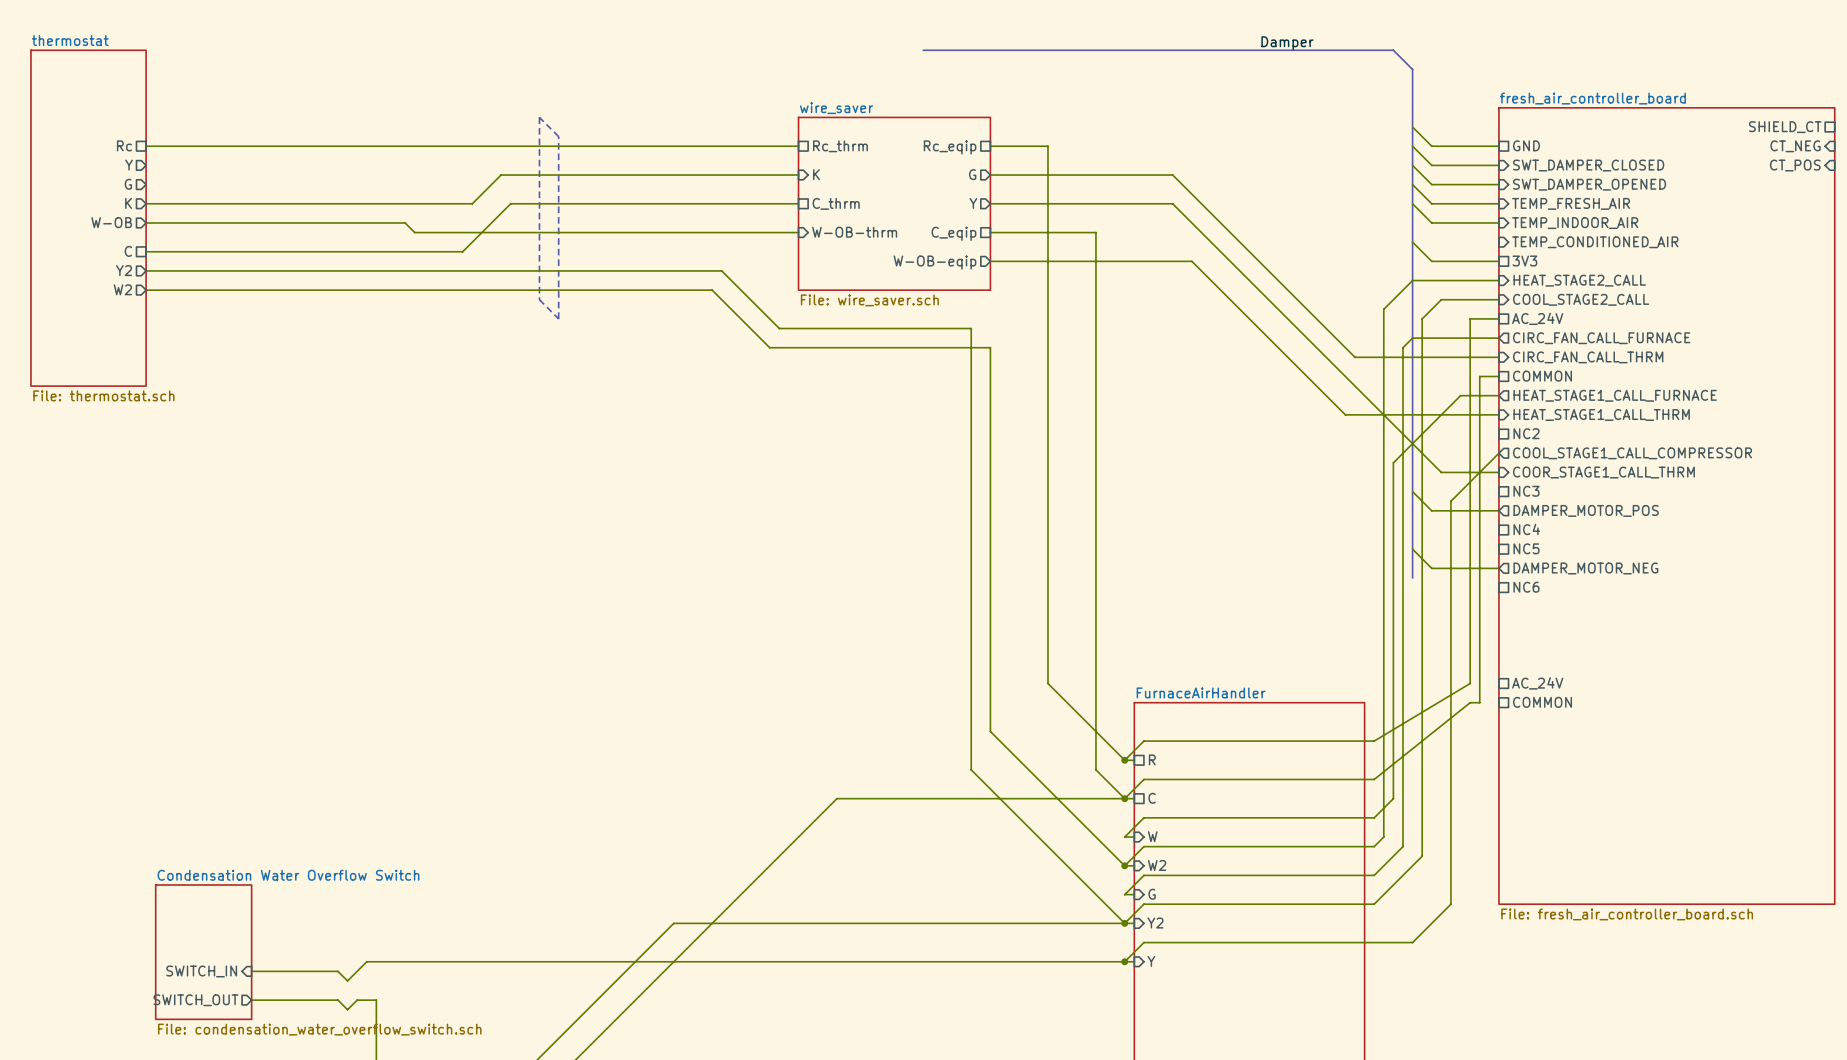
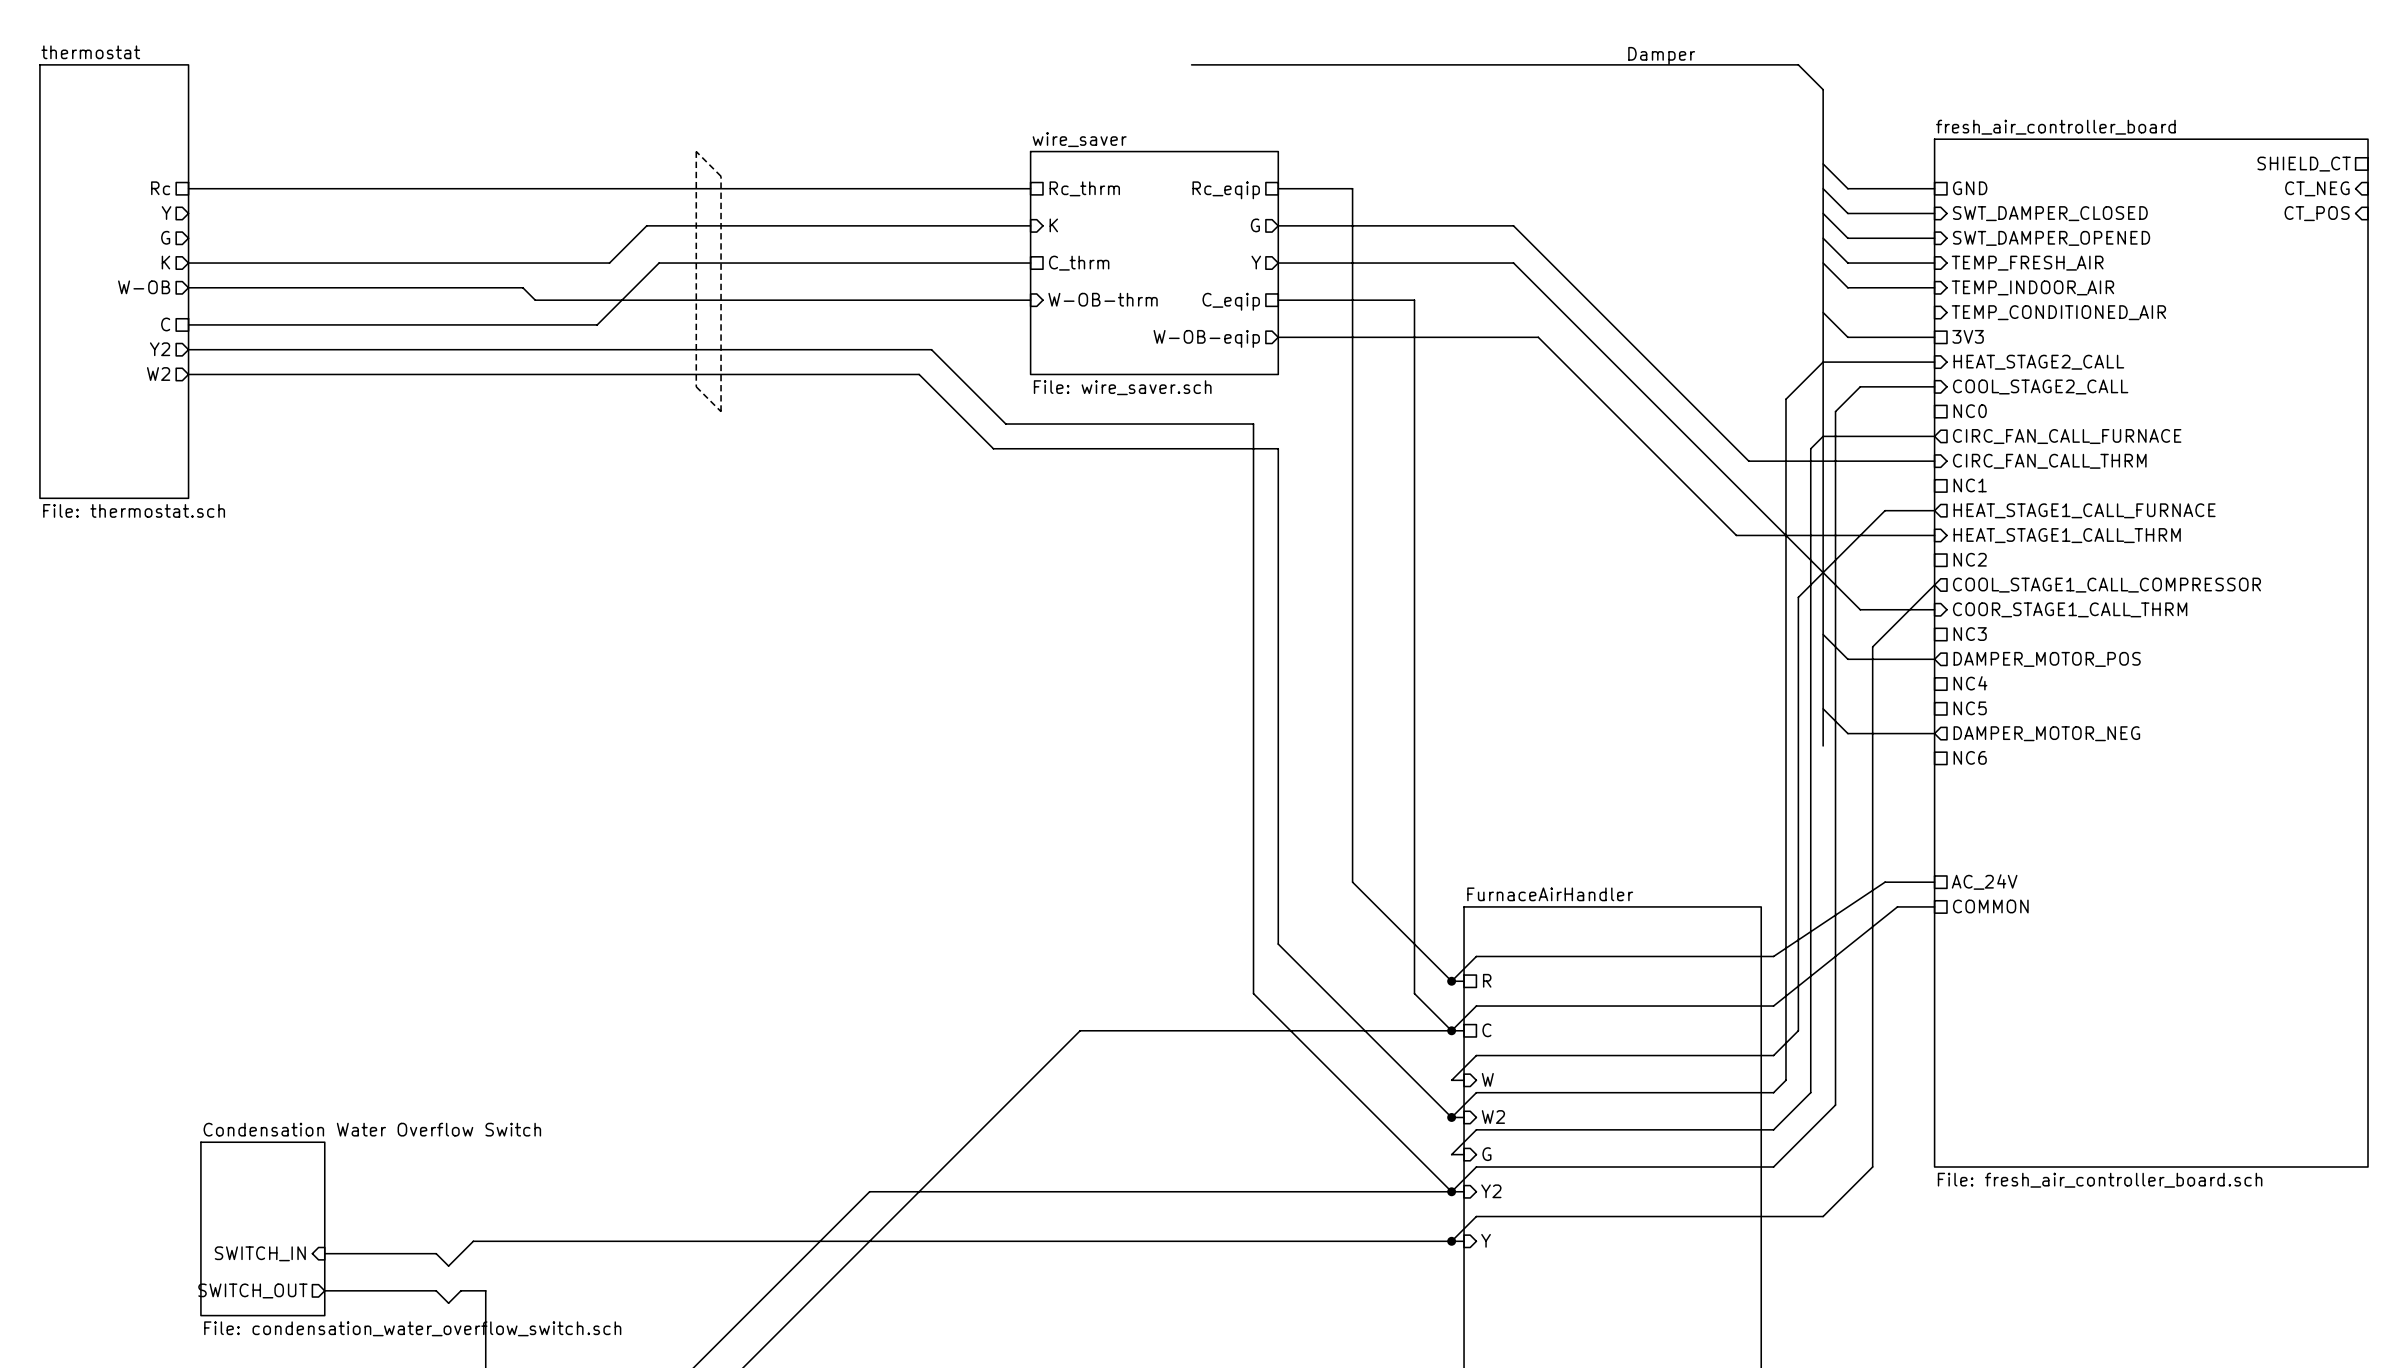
wire: (1498, 318) (1470, 318) (1470, 683) (1374, 741) -> (1934, 882) (1885, 882) (1773, 956)
sheet pin: AC_24V (1537, 318) -> NC0 (1970, 411)
wire: (1498, 376) (1479, 376) (1479, 702) -> (1934, 906) (1909, 906)
sheet pin: COMMON (1542, 376) -> NC1 (1970, 485)

